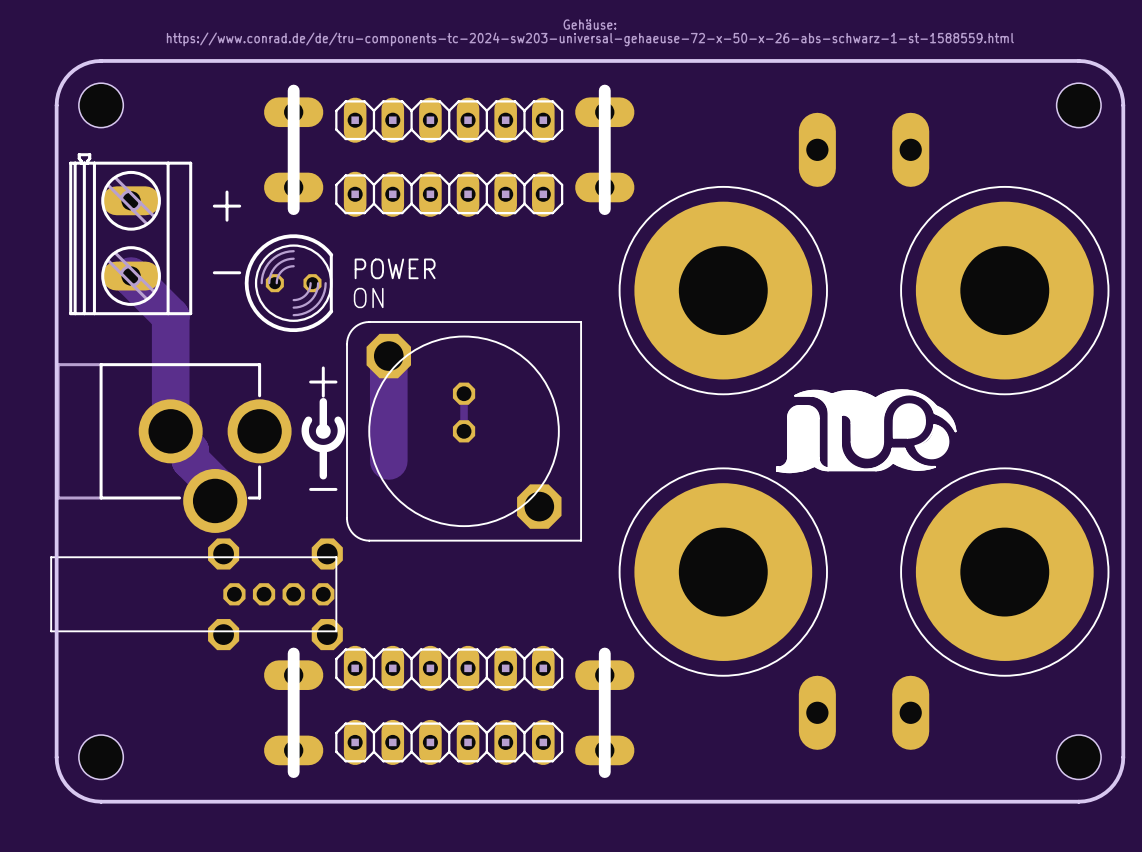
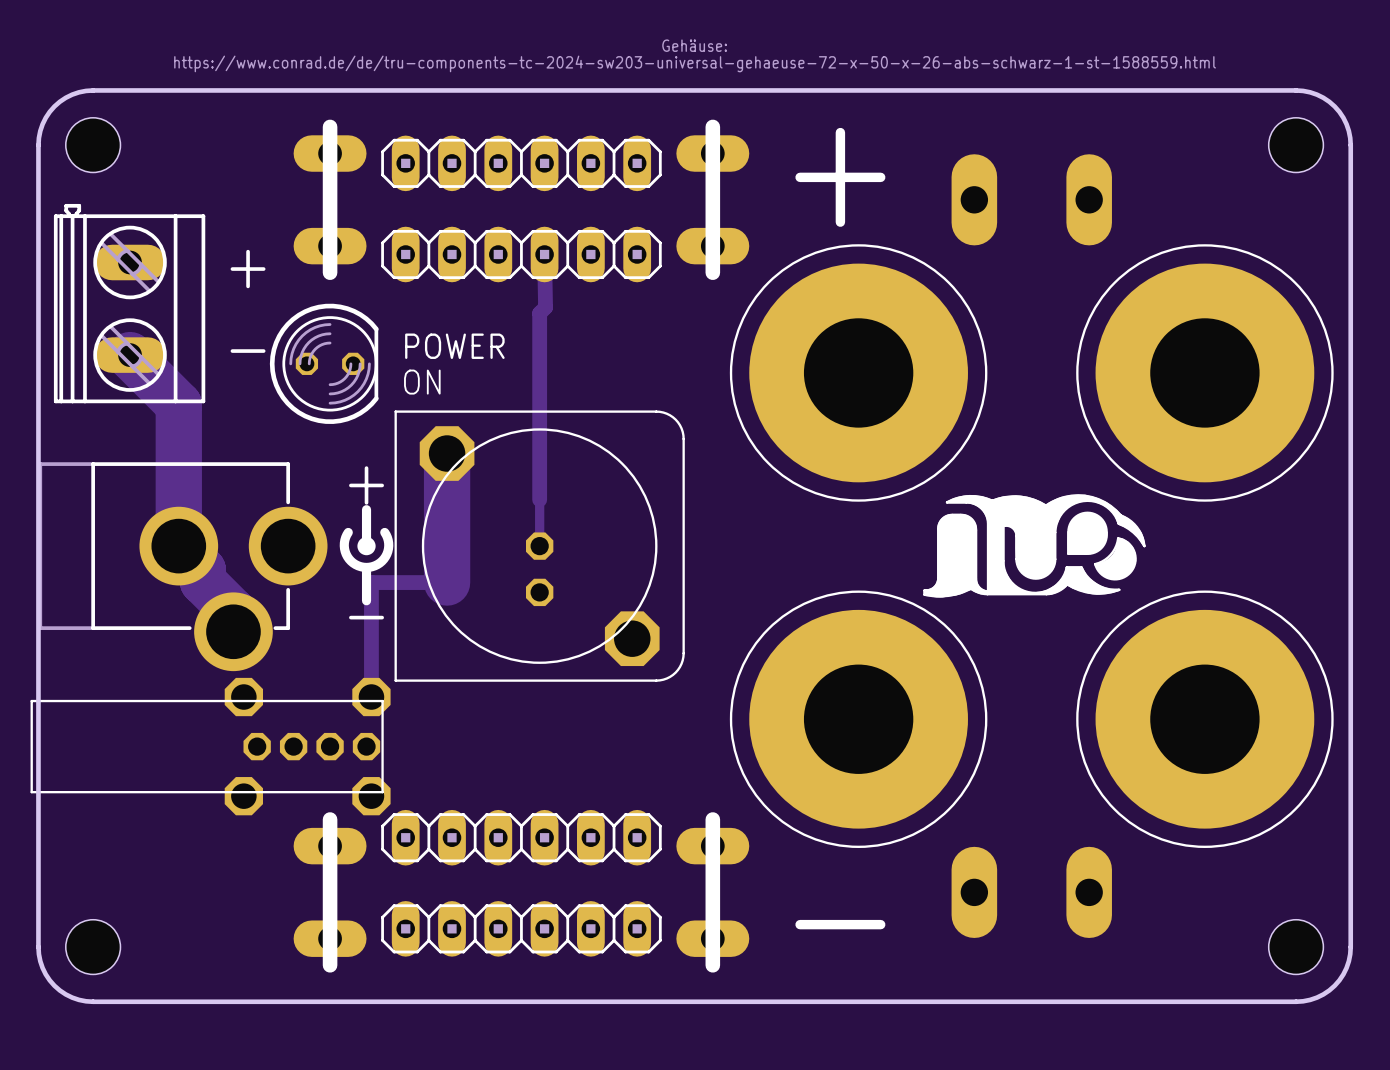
text: none -> + (840, 177)
track: none -> (544, 254) (545, 307) (539, 313) (539, 499)
part rotation: 0° (464, 431) -> 180° (539, 546)
track: none -> (447, 582) (371, 582) (371, 697)
text: none -> - (840, 924)

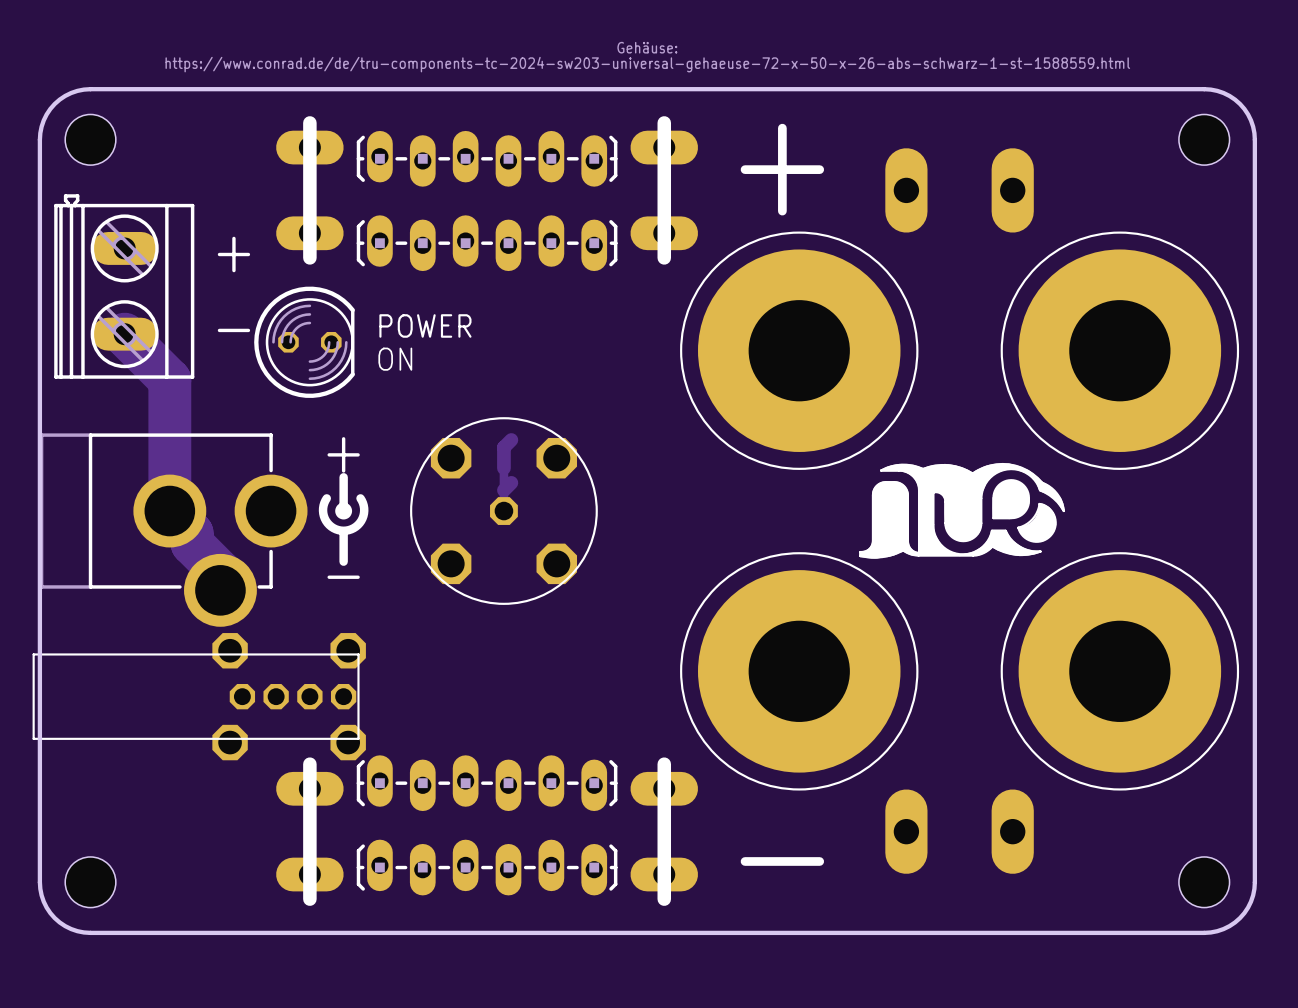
part footprint: [381, 135, 662, 192] -> [356, 130, 618, 187]
part footprint: [381, 226, 662, 283] -> [356, 215, 618, 272]
track: (544, 254) (545, 307) (539, 313) (539, 477) -> (511, 439) (503, 447)
part footprint: [394, 410, 685, 682] -> [410, 417, 598, 605]
track: (447, 453) (447, 582) (371, 582) (371, 697) -> none
track: none -> (511, 482) (503, 490)
part footprint: [381, 809, 662, 866] -> [356, 755, 618, 812]
part footprint: [381, 901, 662, 957] -> [356, 839, 618, 896]

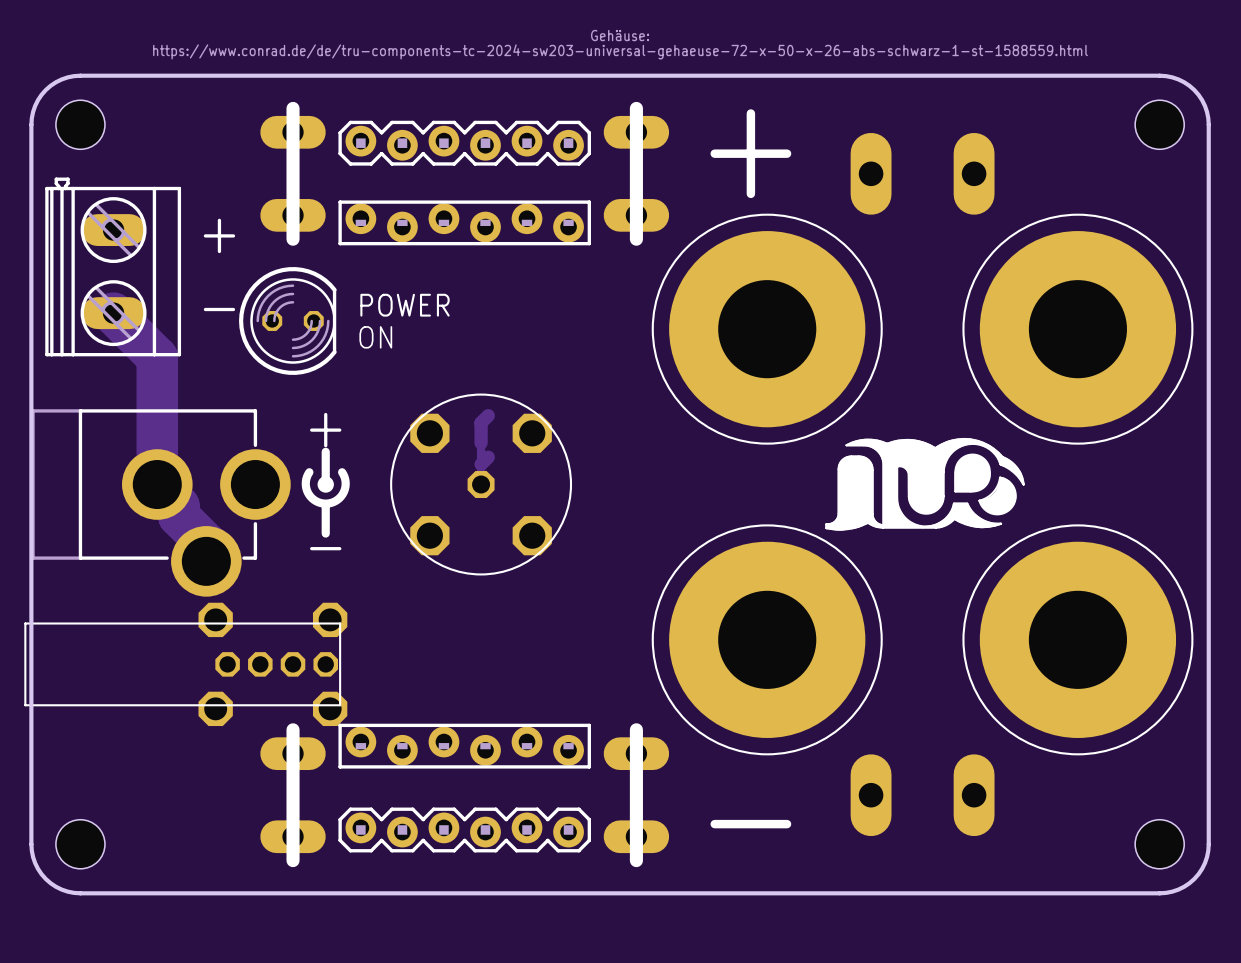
part footprint: [356, 130, 618, 187] -> [338, 120, 591, 166]
part footprint: [356, 215, 618, 272] -> [338, 200, 591, 246]
part footprint: [356, 755, 618, 812] -> [338, 723, 591, 769]
part footprint: [356, 839, 618, 896] -> [338, 807, 591, 853]

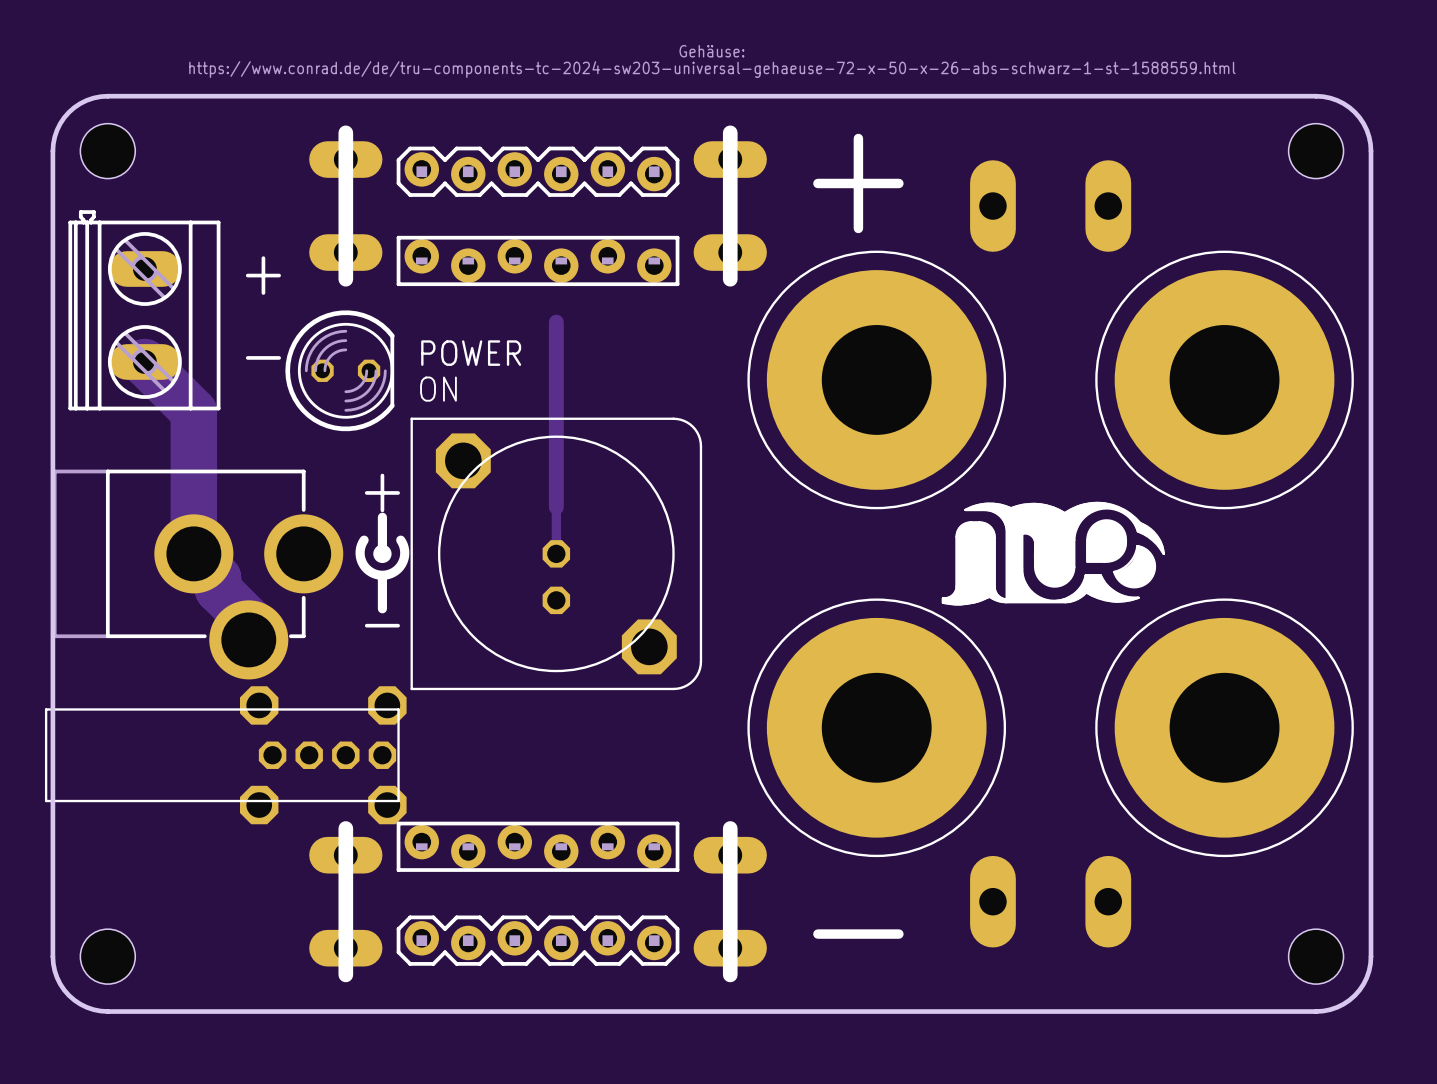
part footprint: [390, 393, 573, 576] -> [410, 417, 703, 691]
track: (488, 415) (481, 422) -> (556, 322) (556, 484)
track: (488, 457) (481, 464) -> none

